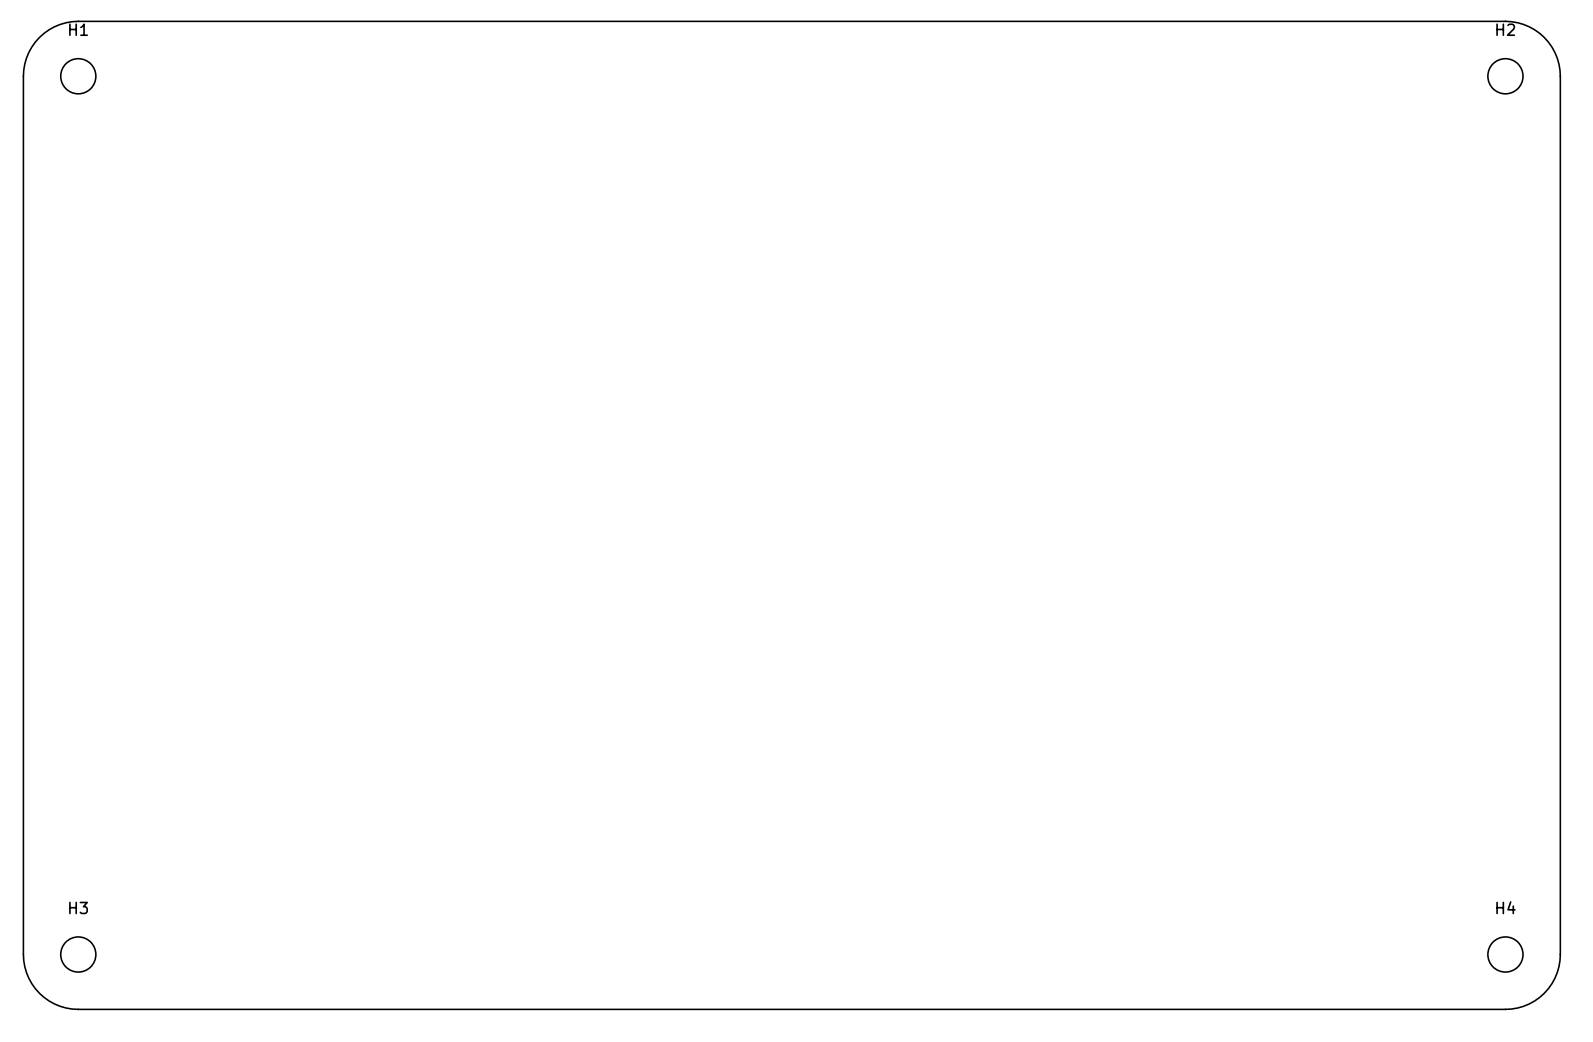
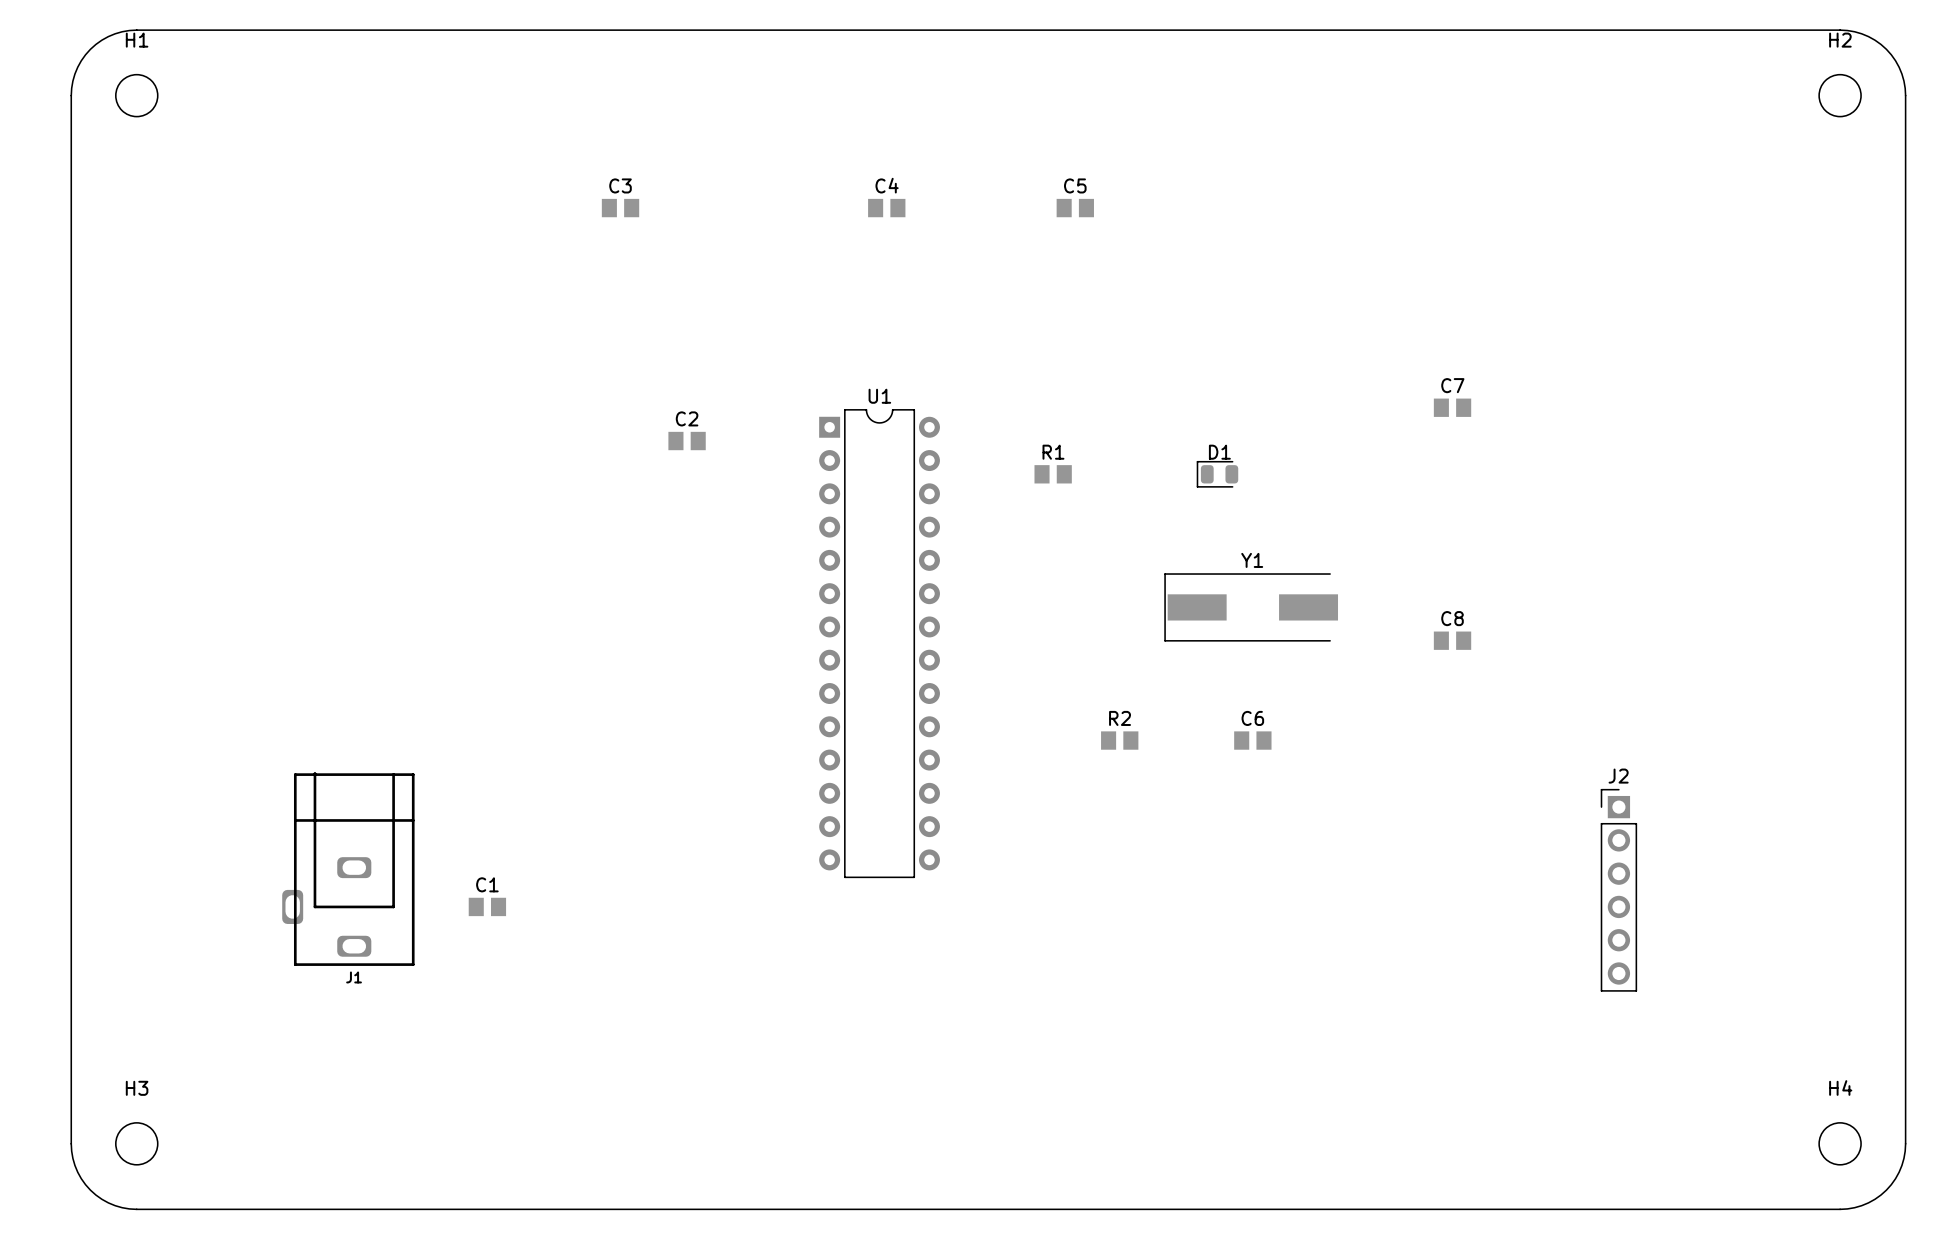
C3: none -> (620, 208)
C4: none -> (886, 208)
C5: none -> (1075, 208)
C7: none -> (1452, 407)
C2: none -> (687, 441)
R1: none -> (1053, 474)
D1: none -> (1217, 474)
Y1: none -> (1251, 607)
C8: none -> (1452, 640)
U1: none -> (879, 643)
R2: none -> (1119, 740)
C6: none -> (1252, 740)
J1: none -> (348, 868)
J2: none -> (1618, 890)
C1: none -> (487, 906)

